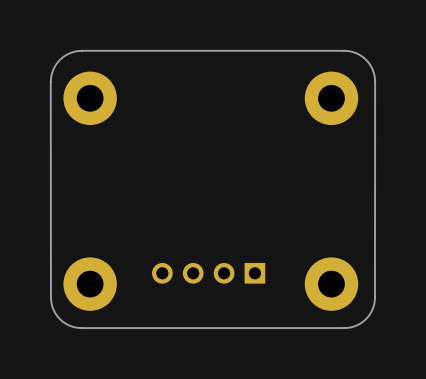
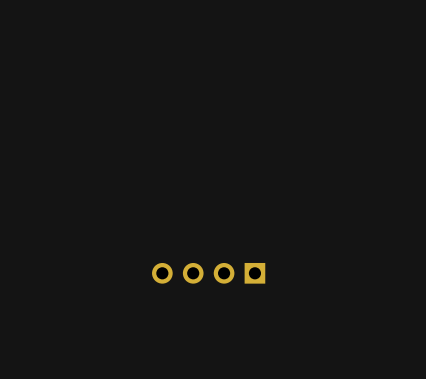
part: (90, 98) -> none
part: (331, 98) -> none
part: (90, 284) -> none
part: (331, 284) -> none
board edge: (50, 297) (50, 81) (54, 66) (62, 57) (73, 51) (81, 50) (344, 50) (359, 54) (368, 62) (372, 69) (375, 81) (374, 297) (371, 310) (363, 321) (354, 326) (344, 328) (77, 327) (69, 325) (59, 319) (53, 309) (50, 297) -> none

